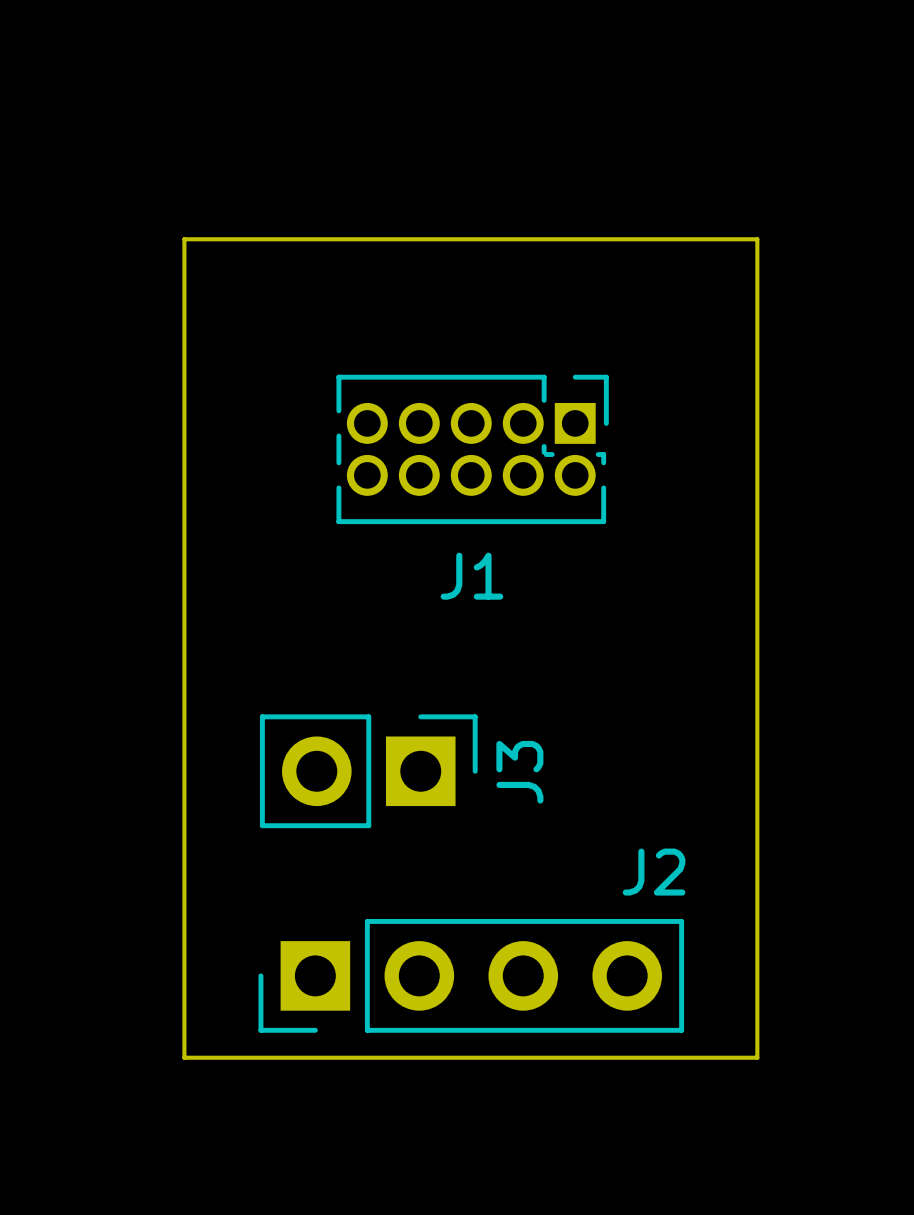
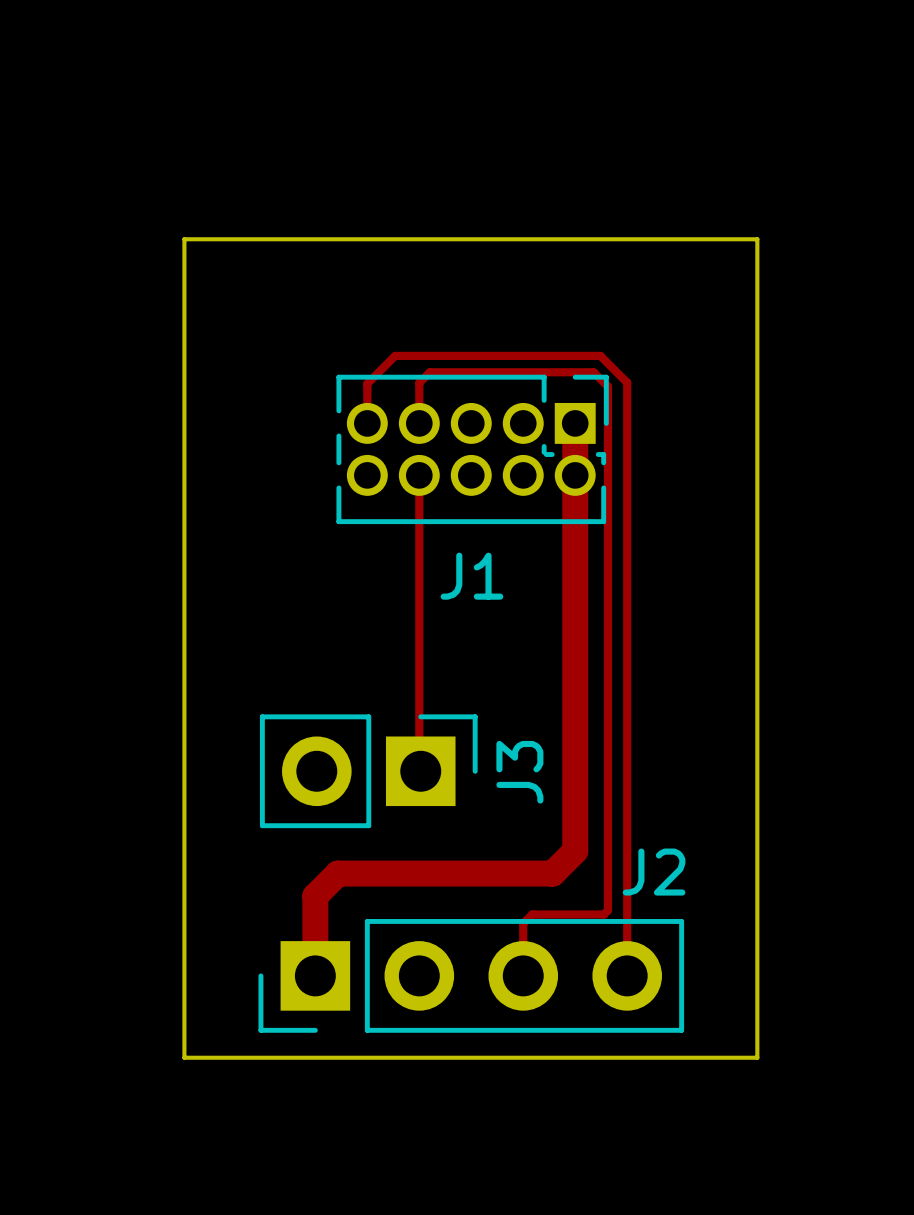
track: none -> (367, 423) (367, 383) (395, 355) (600, 355) (627, 382) (627, 975)
track: none -> (419, 423) (419, 382) (429, 372) (593, 372) (607, 386) (607, 910) (603, 914) (532, 914) (523, 923) (523, 975)
track: none -> (575, 423) (575, 851) (552, 873) (337, 873) (315, 896) (315, 975)
track: none -> (419, 475) (420, 771)

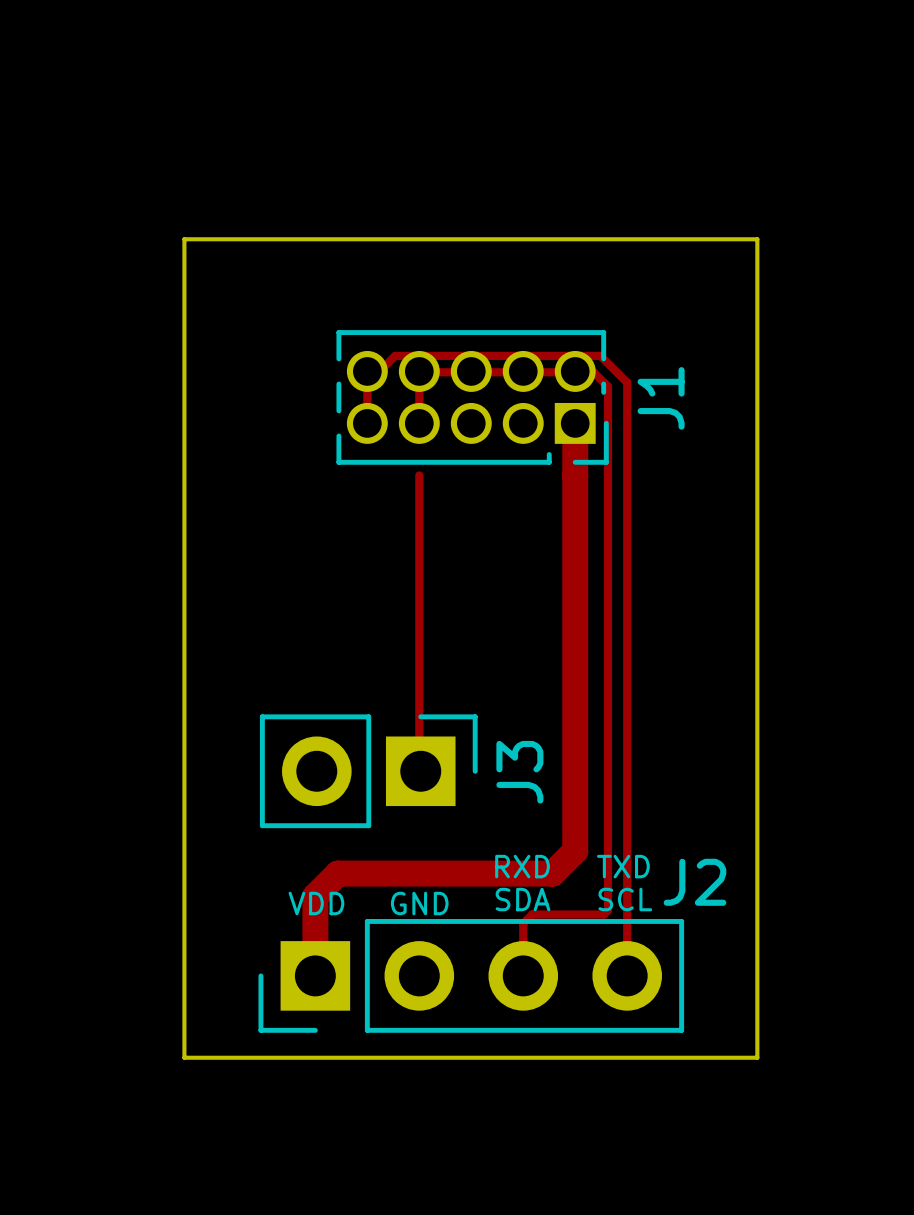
J1 footprint: [336, 374, 609, 525] -> [336, 330, 609, 465]
J1 name position: J1 (471, 576) -> J1 (661, 398)
text: none -> RXD (522, 866)
text: none -> TXD (623, 866)
J2 name position: J2 (654, 872) -> J2 (694, 882)
text: none -> SDA (523, 899)
text: none -> SCL (625, 899)
text: none -> VDD (316, 903)
text: none -> GND (419, 903)

